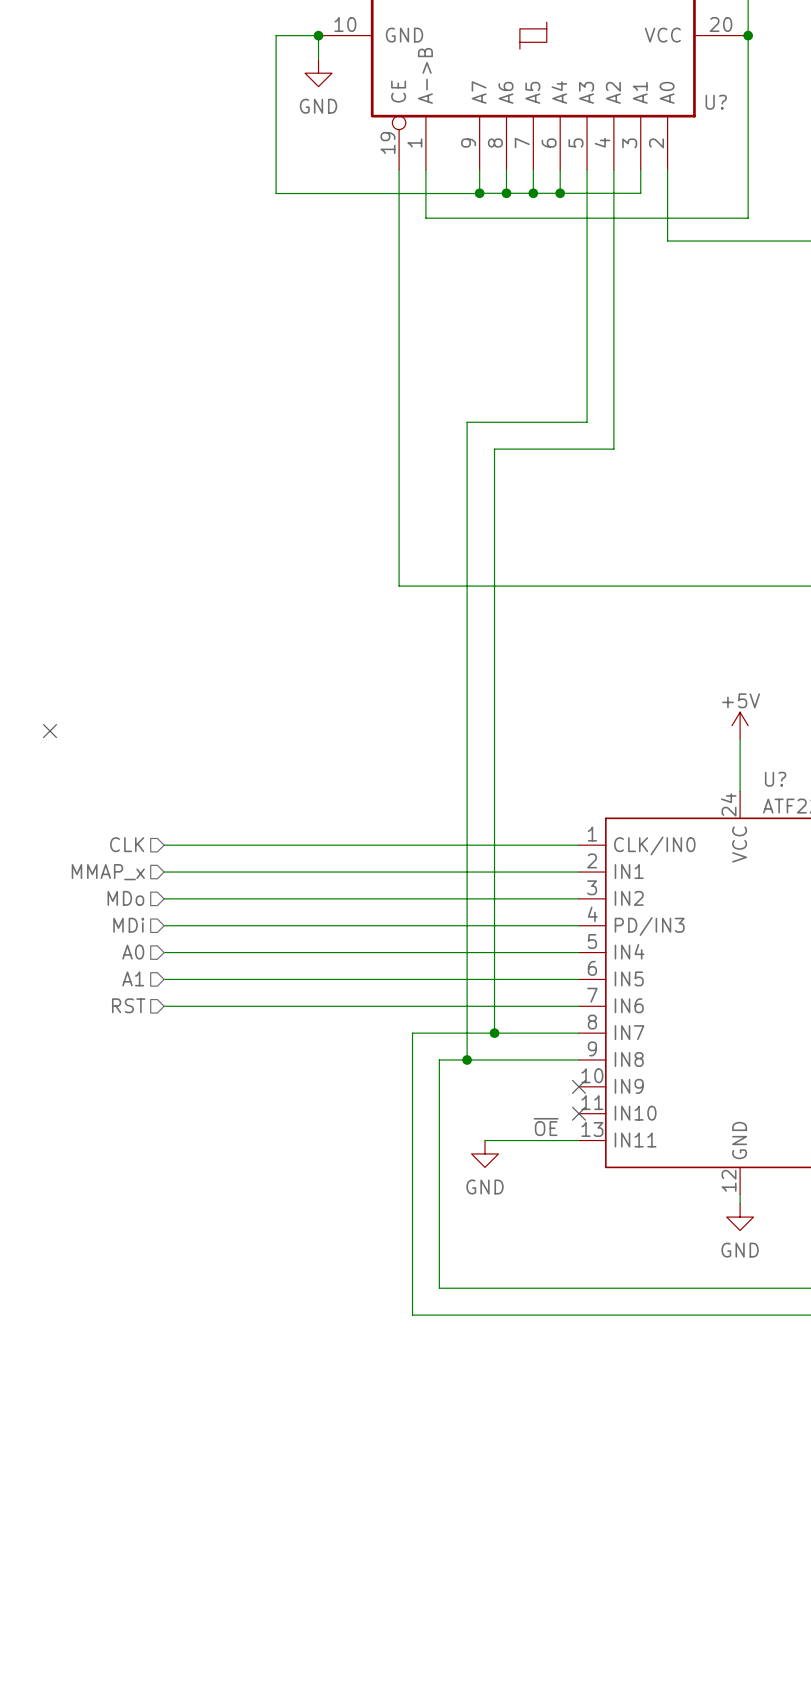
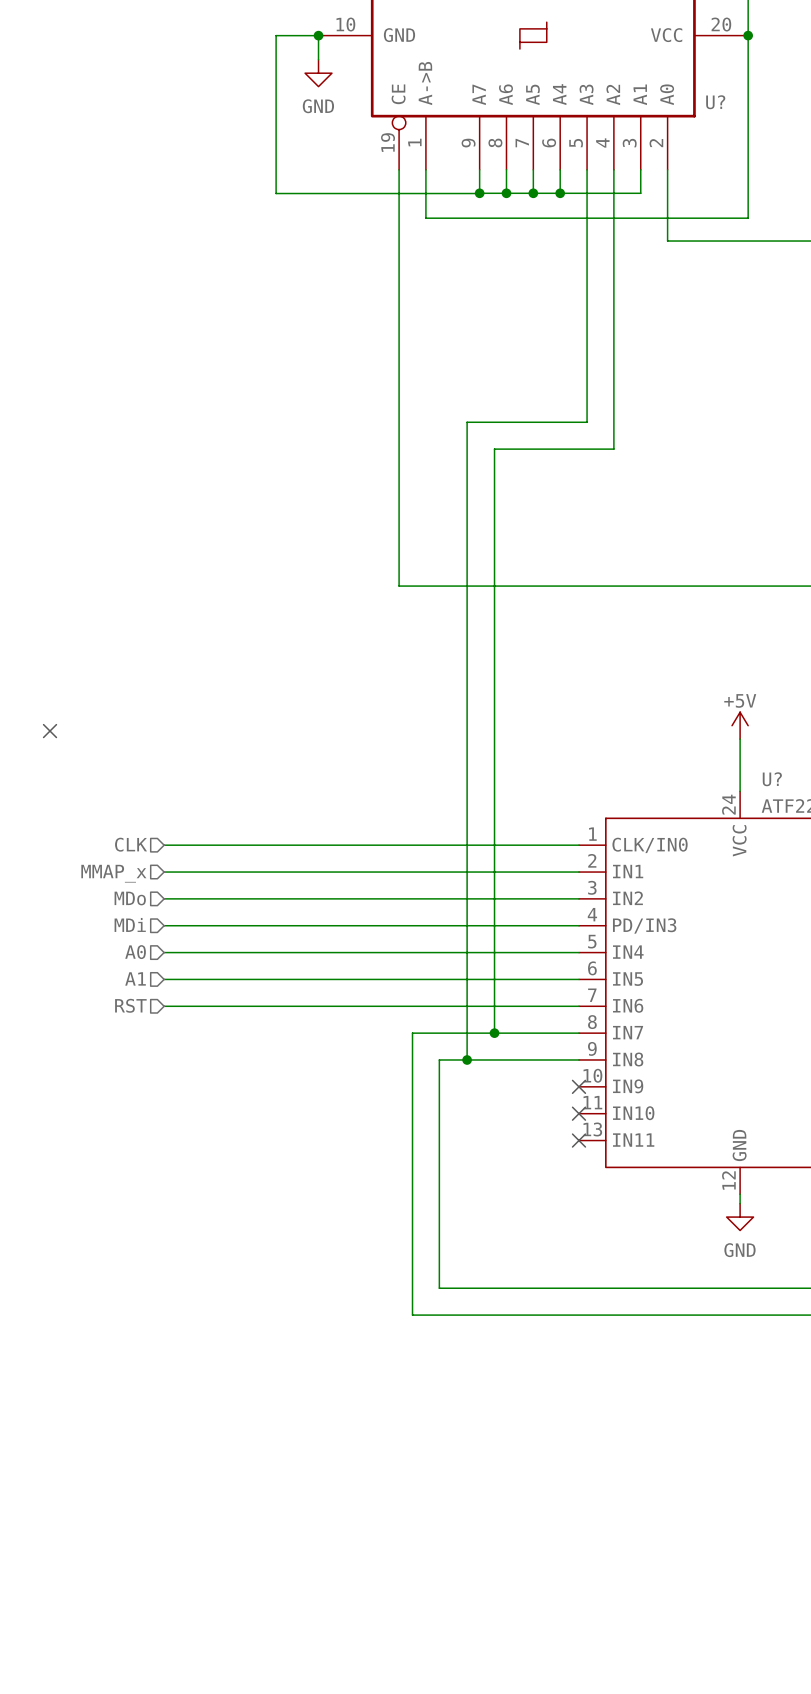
label: ~{OE} (546, 1127) -> none
wire: (485, 1140) (578, 1140) -> none
no-connect mark: none -> (578, 1140)
power symbol: GND (485, 1153) -> none

